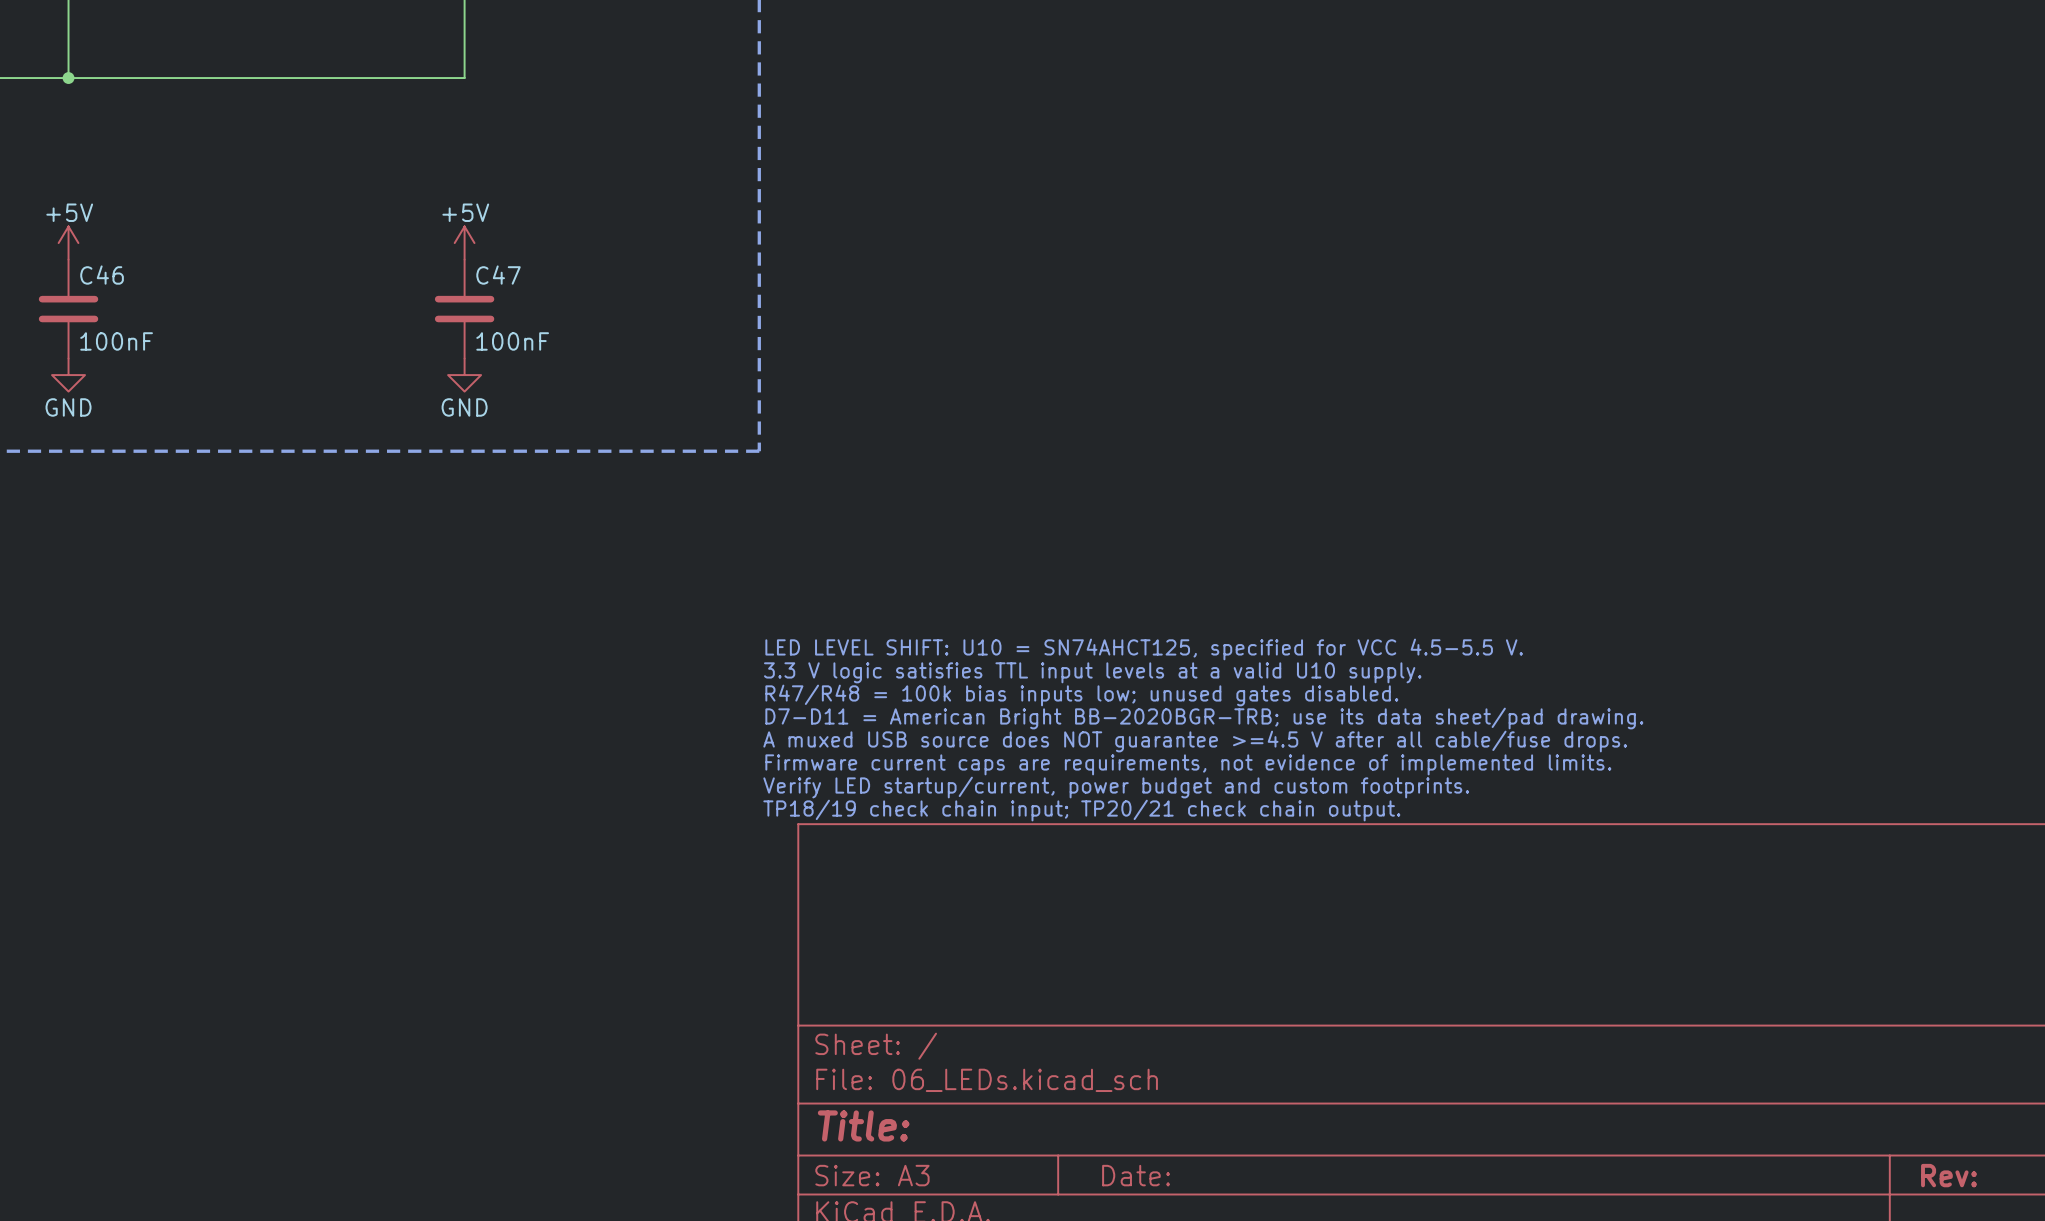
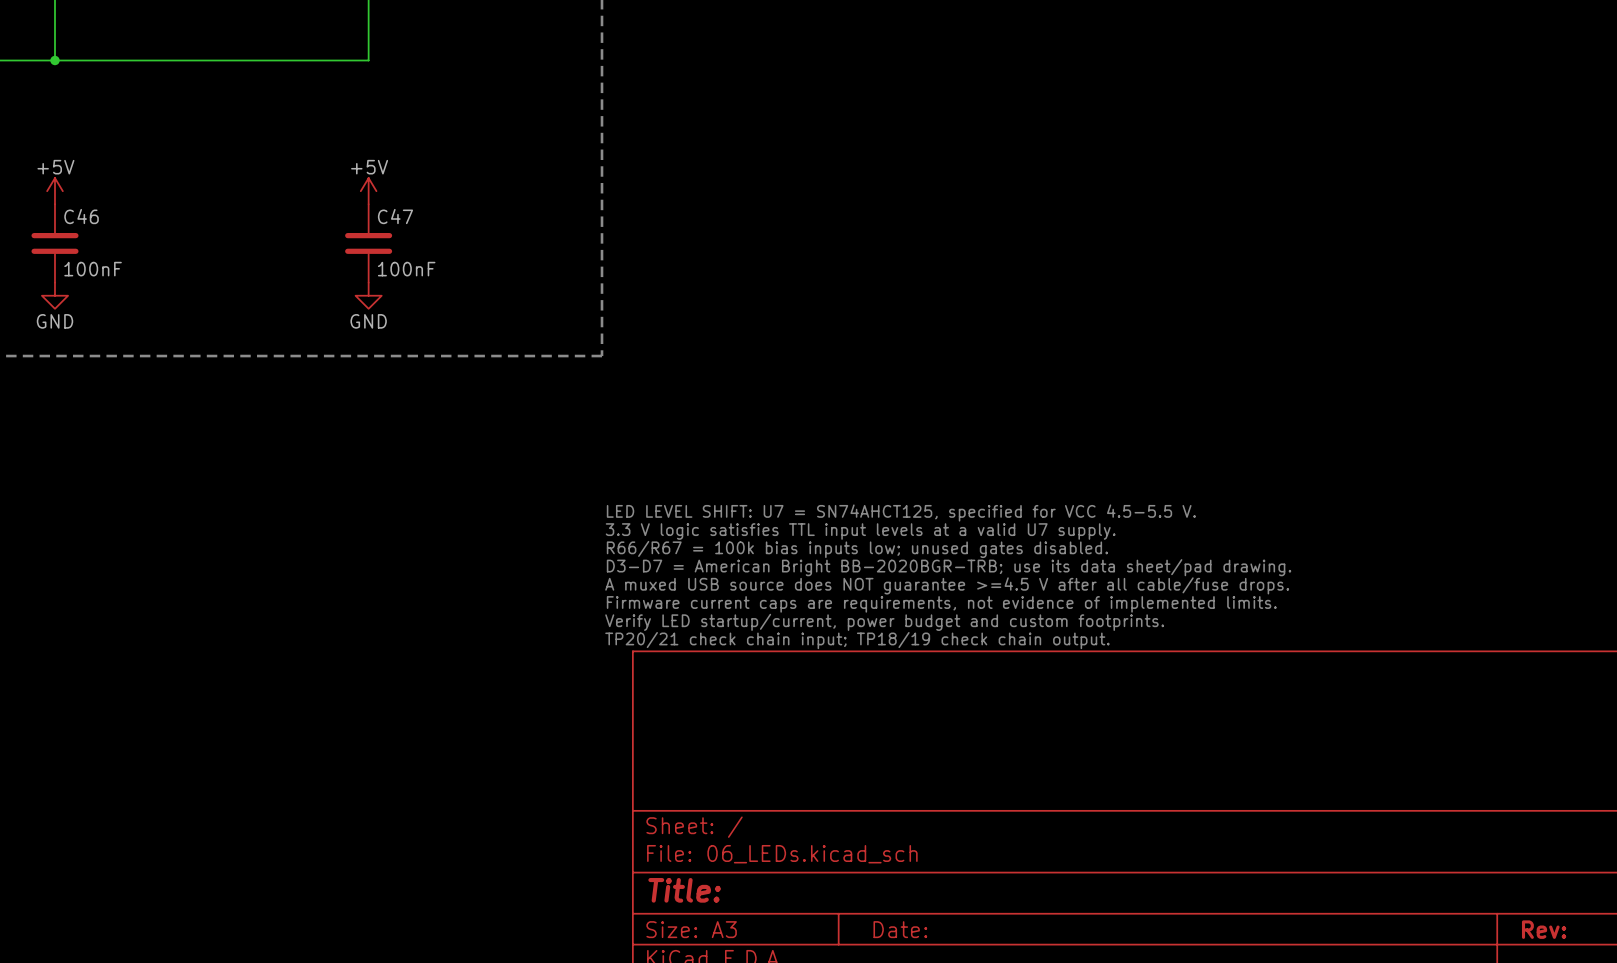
text: LED LEVEL SHIFT: U10 = SN74AHCT125, specified for VCC 4.5-5.5 V. (1144, 649) -> LED LEVEL SHIFT: U7 = SN74AHCT125, specified for VCC 4.5-5.5 V. (901, 513)
text: 3.3 V logic satisfies TTL input levels at a valid U10 supply. (1092, 672) -> 3.3 V logic satisfies TTL input levels at a valid U7 supply. (860, 531)
text: R47/R48 = 100k bias inputs low; unused gates disabled. (1081, 695) -> R66/R67 = 100k bias inputs low; unused gates disabled. (857, 549)
text: D7-D11 = American Bright BB-2020BGR-TRB; use its data sheet/pad drawing. (1204, 718) -> D3-D7 = American Bright BB-2020BGR-TRB; use its data sheet/pad drawing. (949, 567)
text: TP18/19 check chain input; TP20/21 check chain output. (1081, 810) -> TP20/21 check chain input; TP18/19 check chain output. (857, 640)

